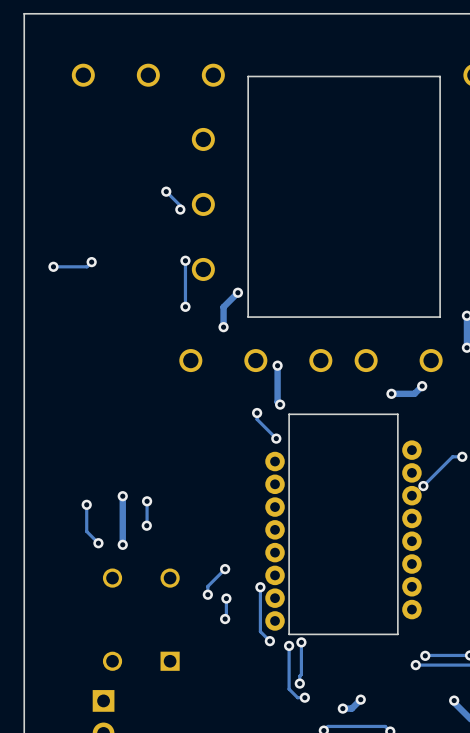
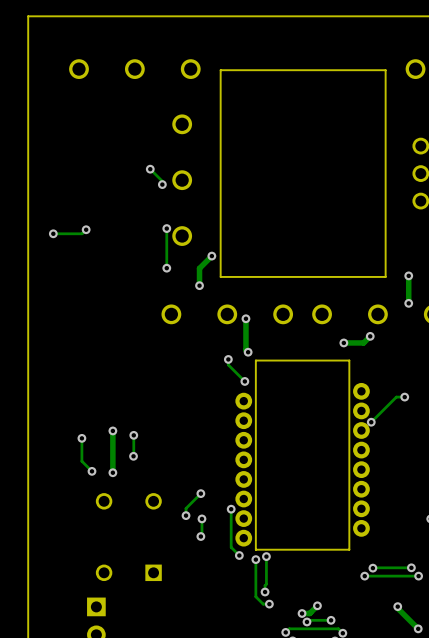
track: none -> (331, 620) (308, 620) (307, 621)
via: none -> (331, 620)
via: none -> (307, 621)

